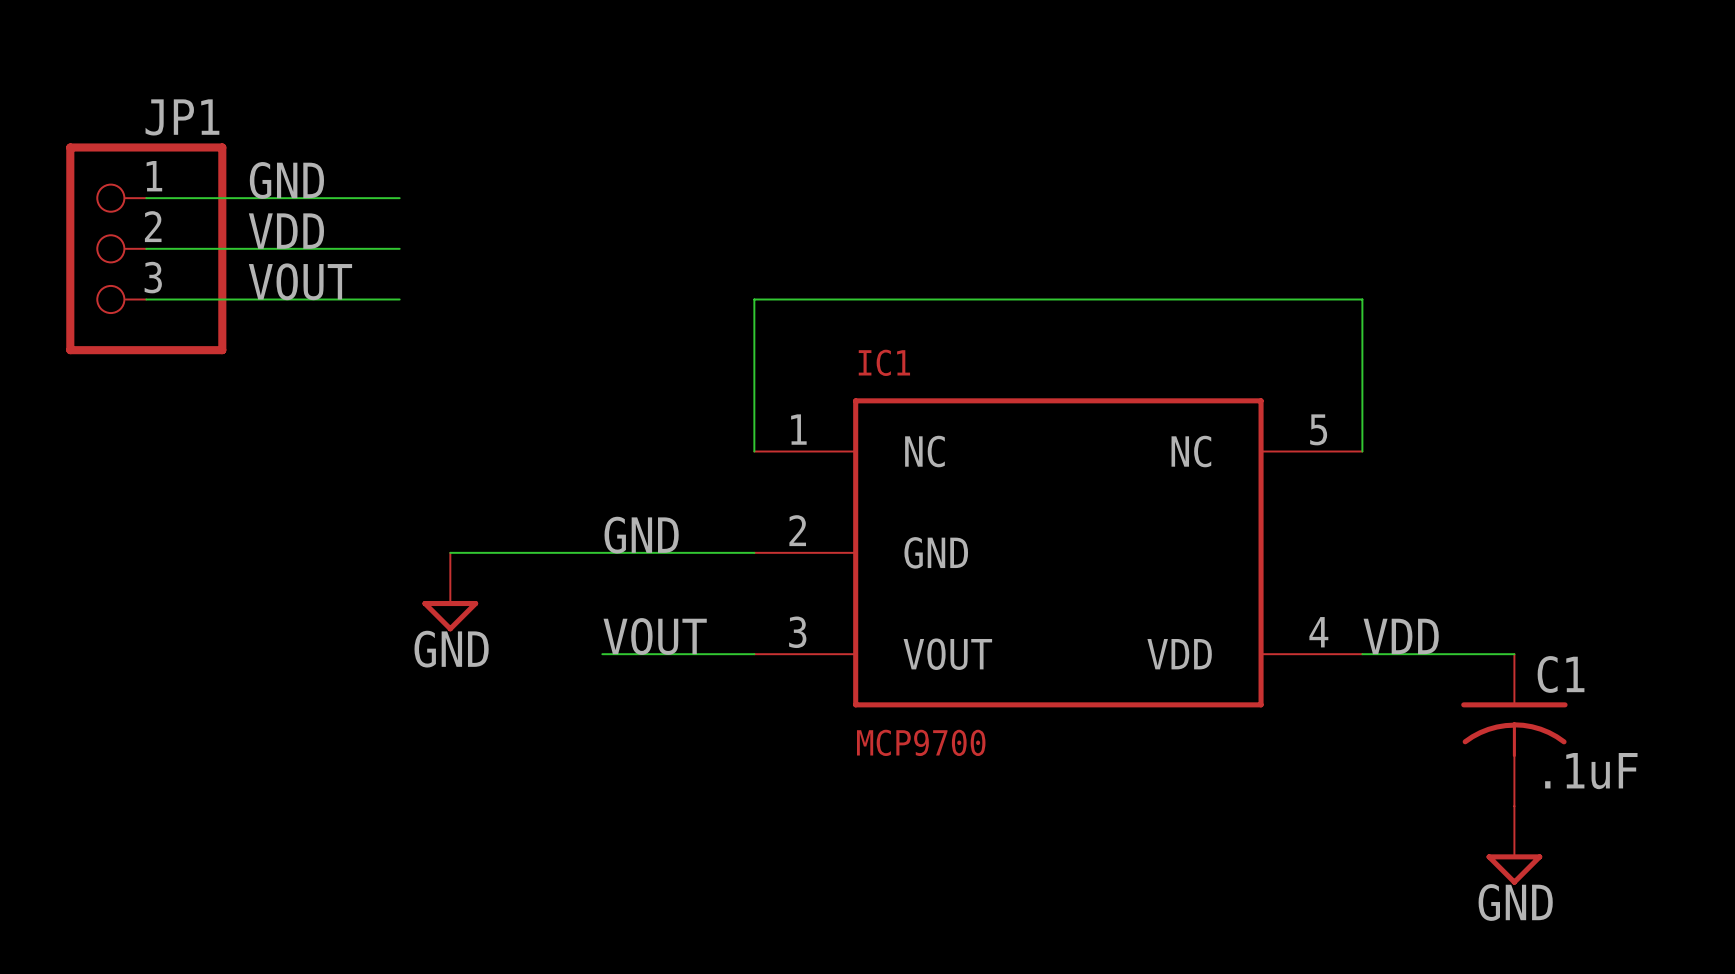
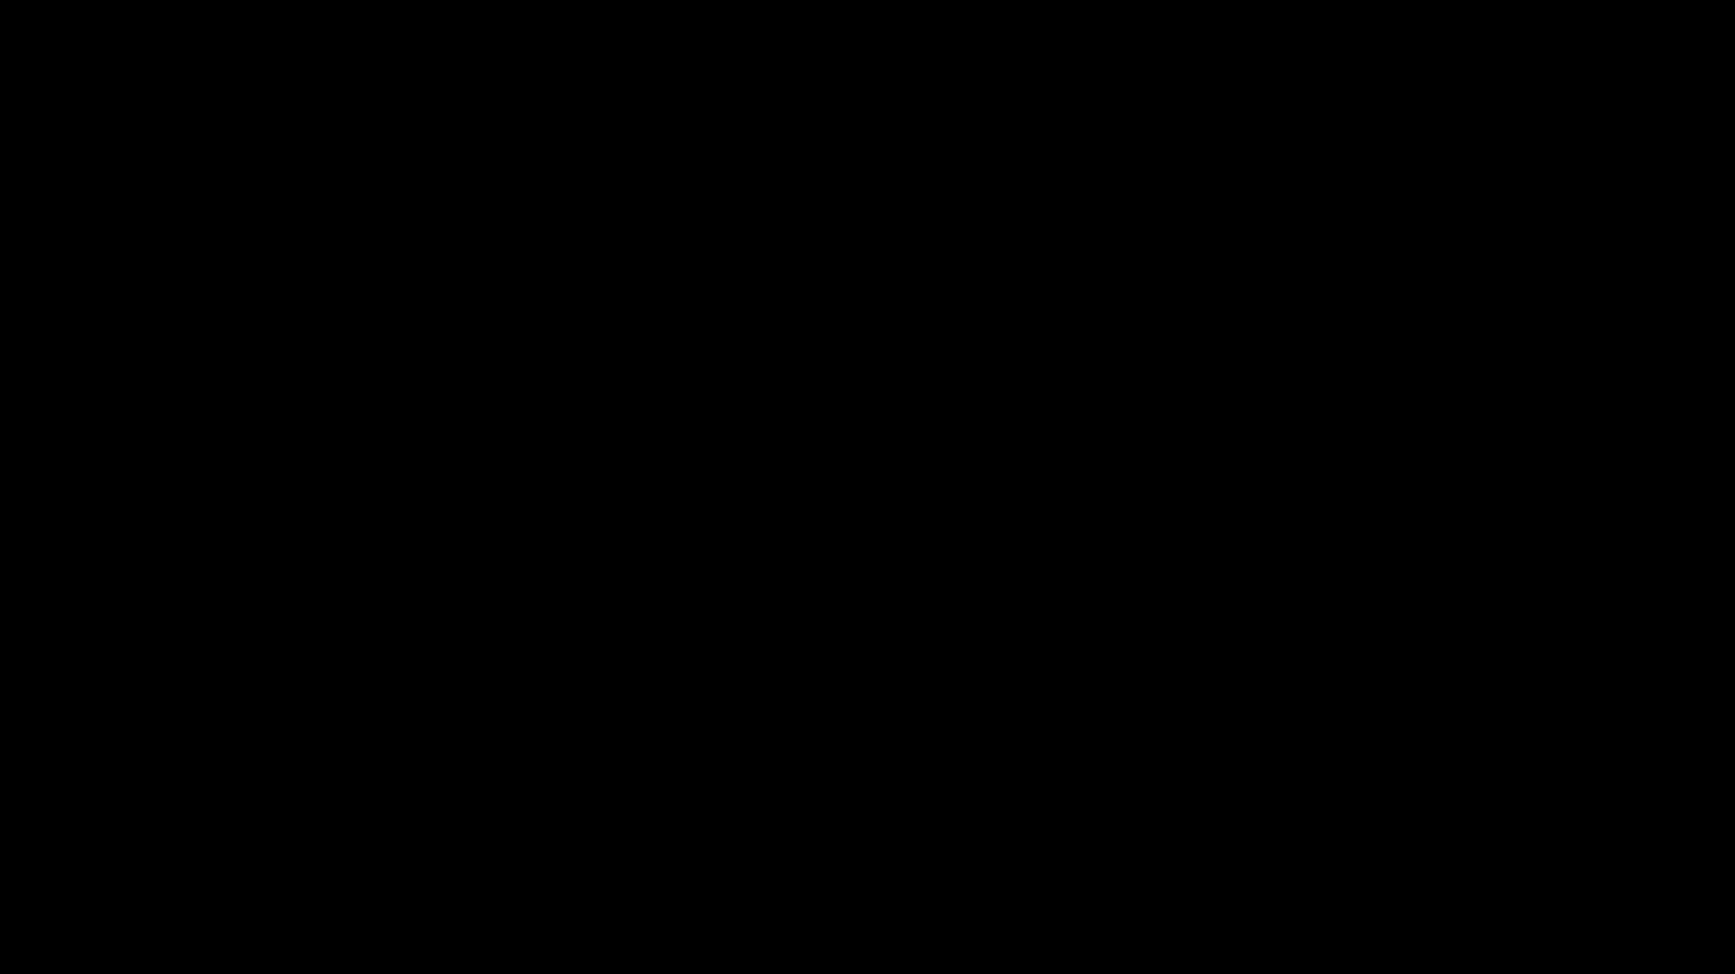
label: GND (286, 180) -> none
wire: (146, 198) (399, 198) -> none
label: VDD (286, 231) -> none
wire: (146, 248) (399, 248) -> none
JP1: (146, 248) -> none
label: VOUT (300, 281) -> none
wire: (146, 299) (399, 299) -> none
wire: (754, 451) (754, 299) (1362, 299) (1362, 451) -> none
label: GND (641, 535) -> none
wire: (450, 552) (754, 552) -> none
IC1: MCP9700 (1058, 552) -> none
power symbol: GND (450, 592) -> none
label: VOUT (655, 636) -> none
label: VDD (1401, 636) -> none
wire: (602, 654) (754, 654) -> none
wire: (1362, 654) (1514, 654) -> none
C1: .1uF (1514, 730) -> none
power symbol: GND (1514, 845) -> none

